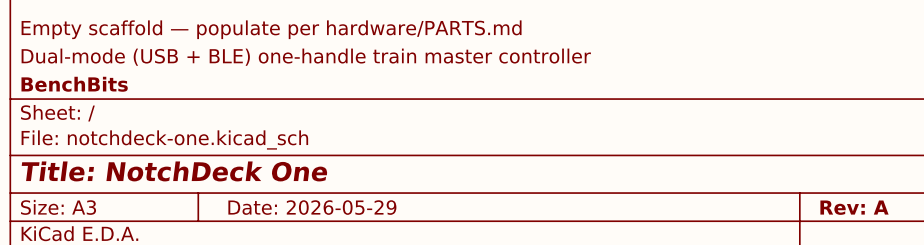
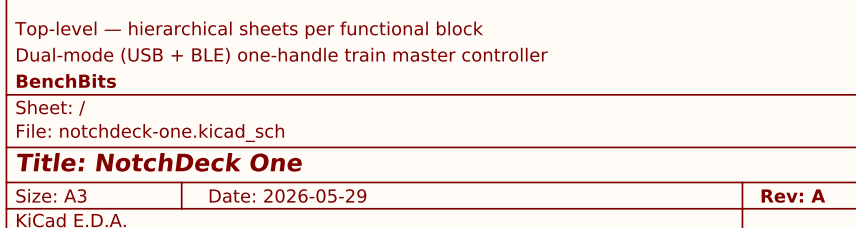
title block: Empty scaffold — populate per hardware/PARTS.md (271, 29) -> Top-level — hierarchical sheets per functional block (249, 30)

